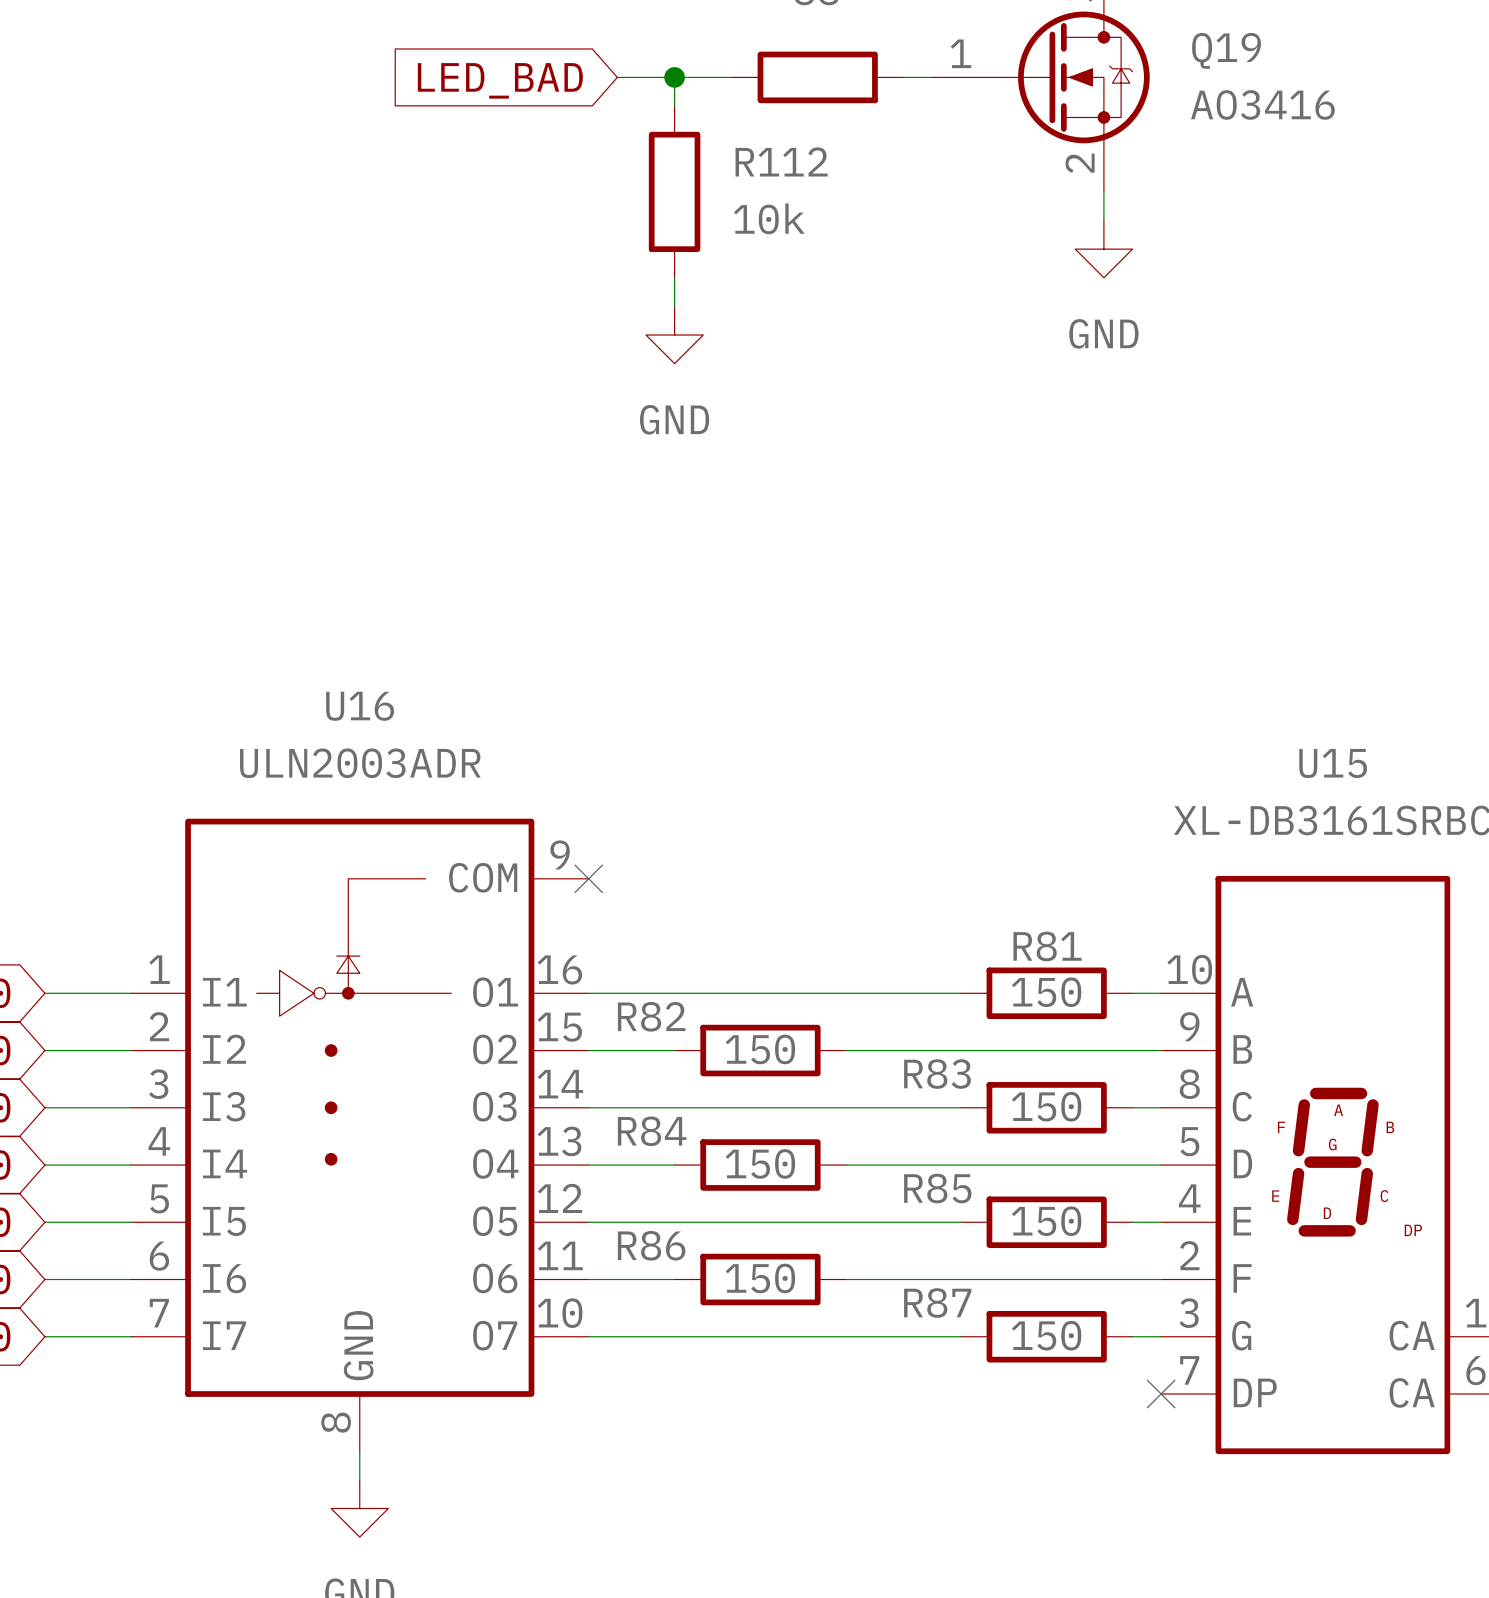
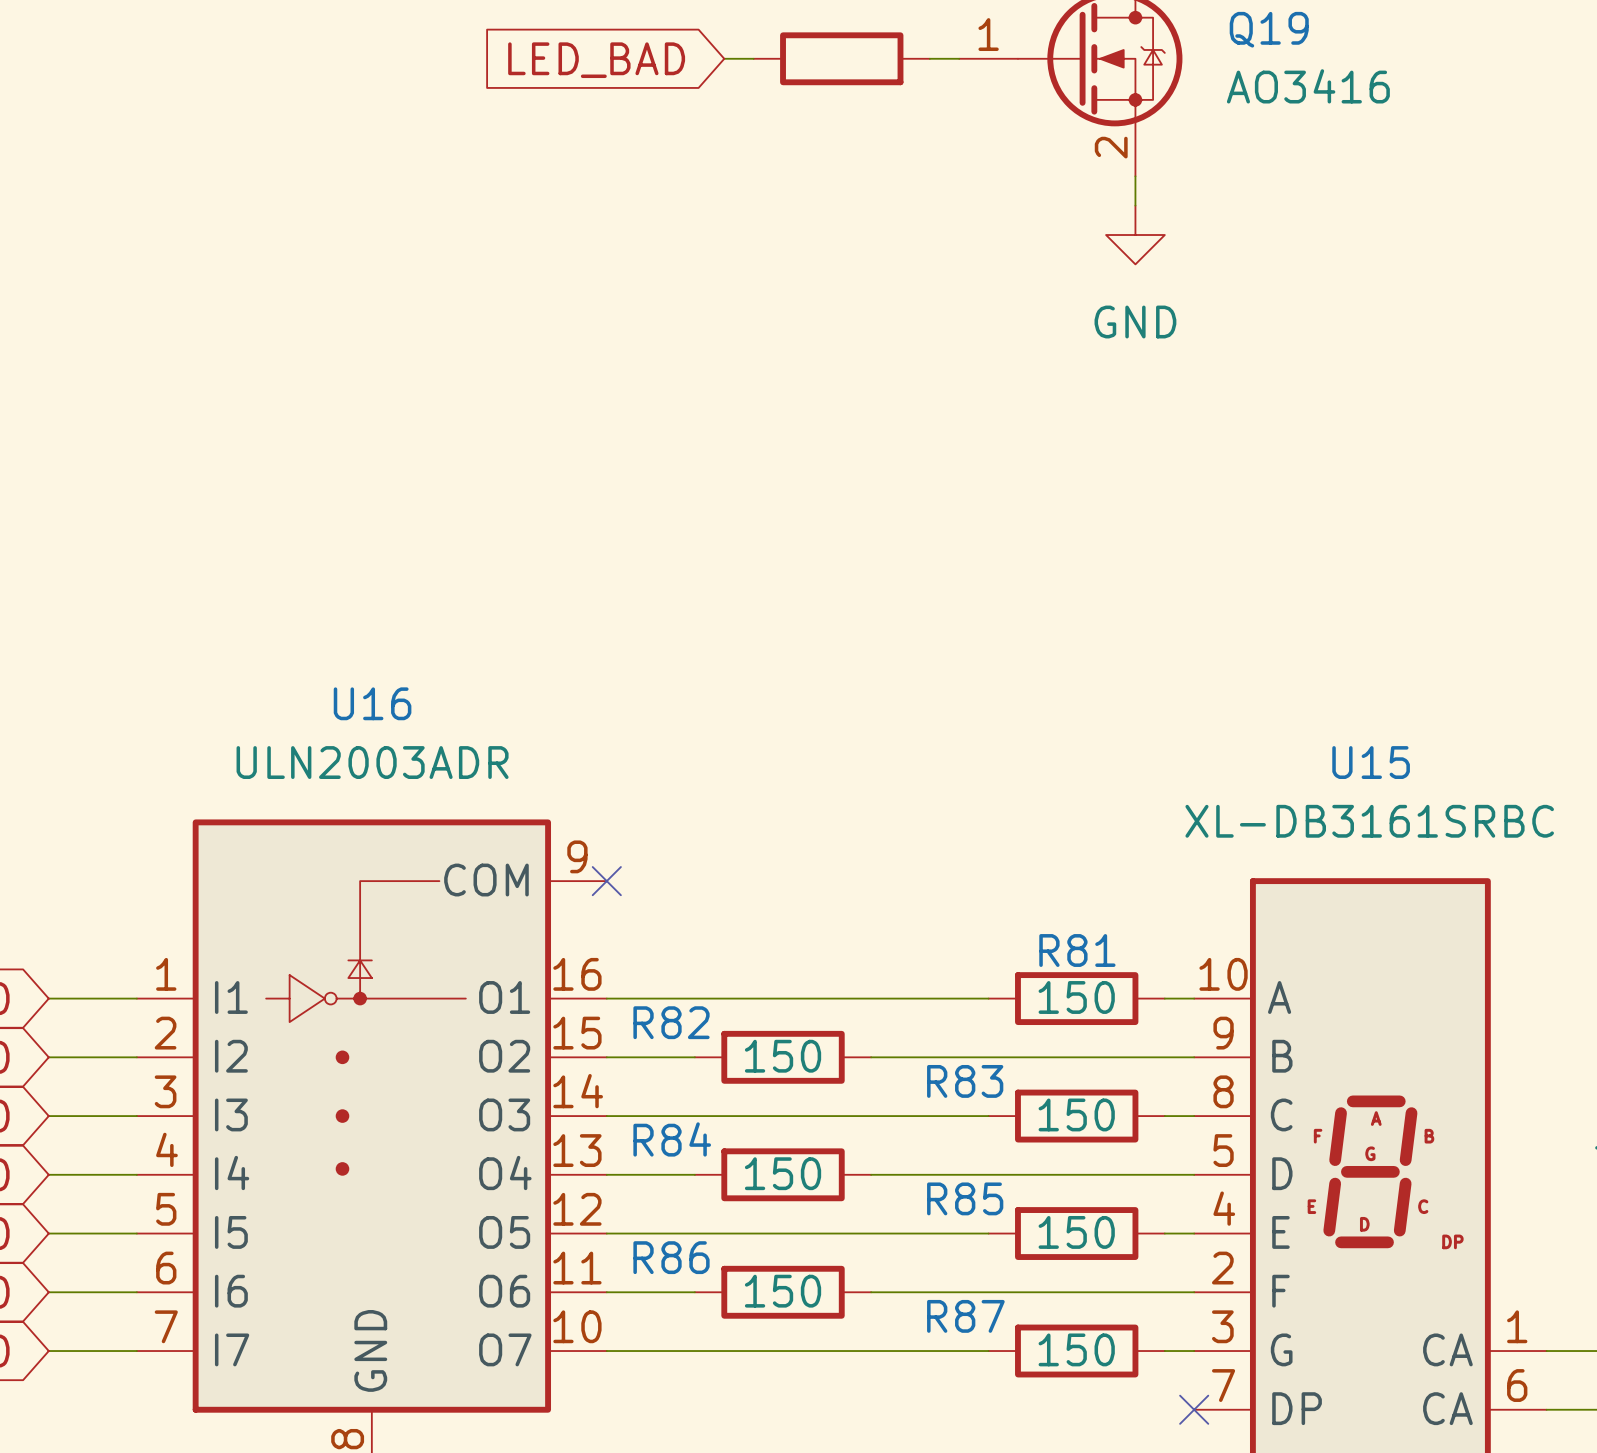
wire: (617, 77) (703, 77) -> none
wire: (674, 77) (674, 106) -> none
junction: (674, 77) -> none
global label position: LED_BAD (500, 80) -> LED_BAD (596, 60)
R112: 10k (674, 191) -> none
wire: (674, 277) (674, 306) -> none
power symbol: GND (674, 335) -> none

